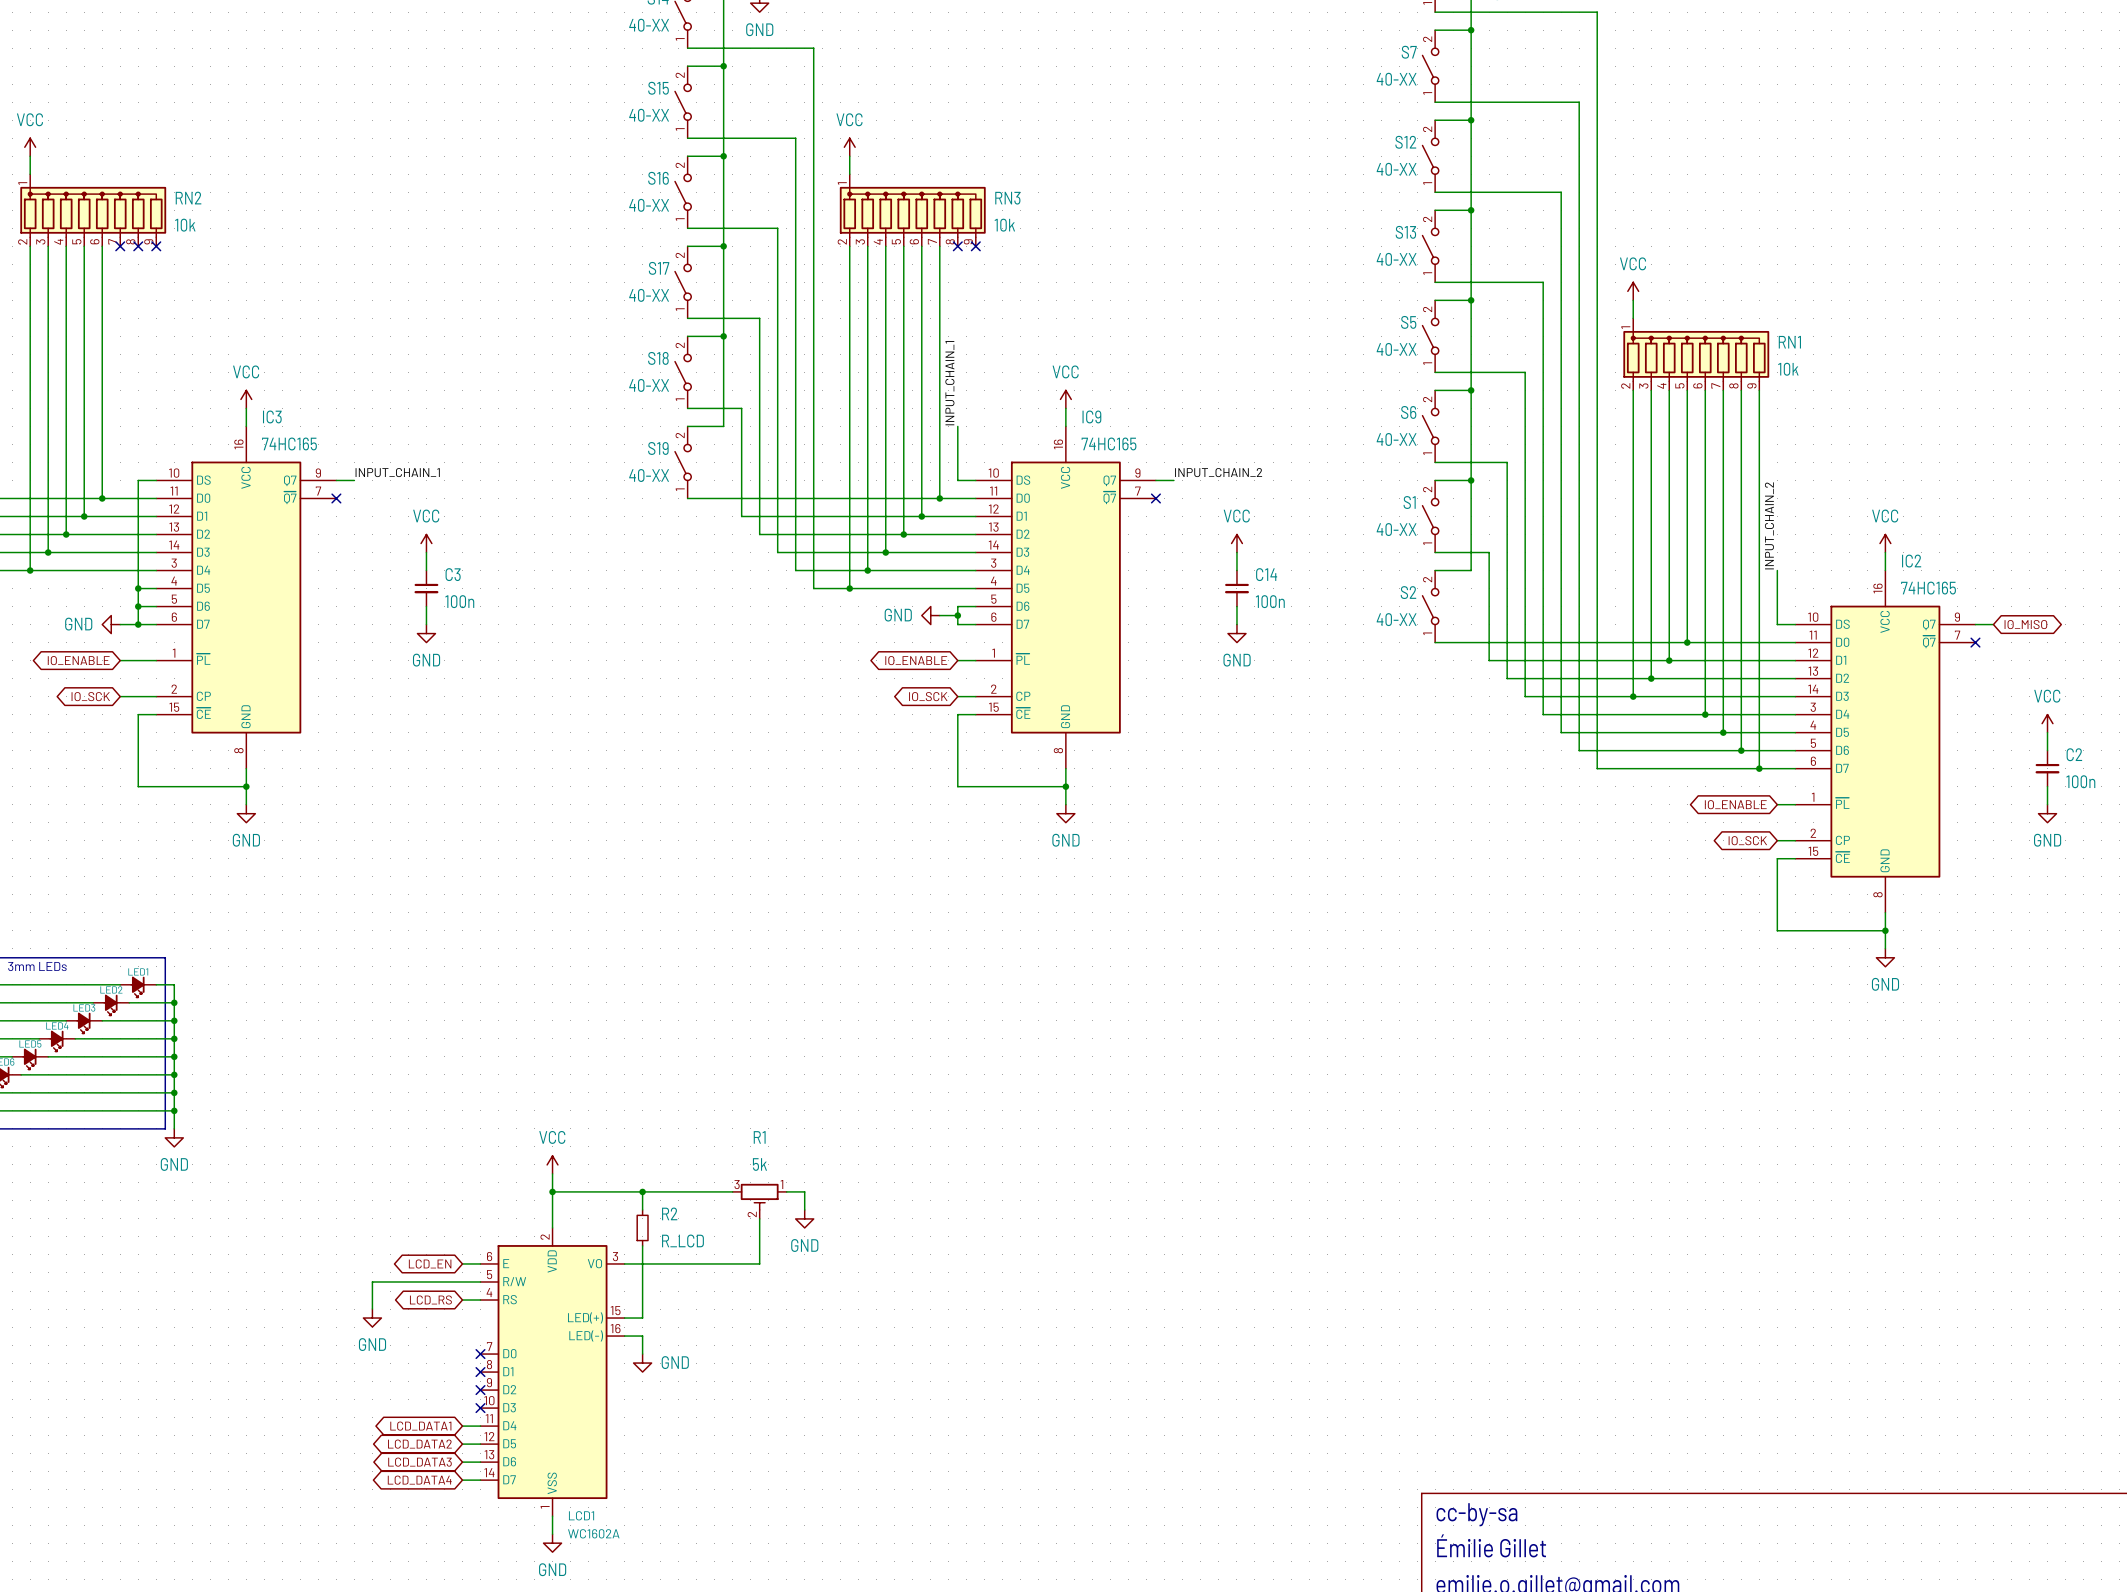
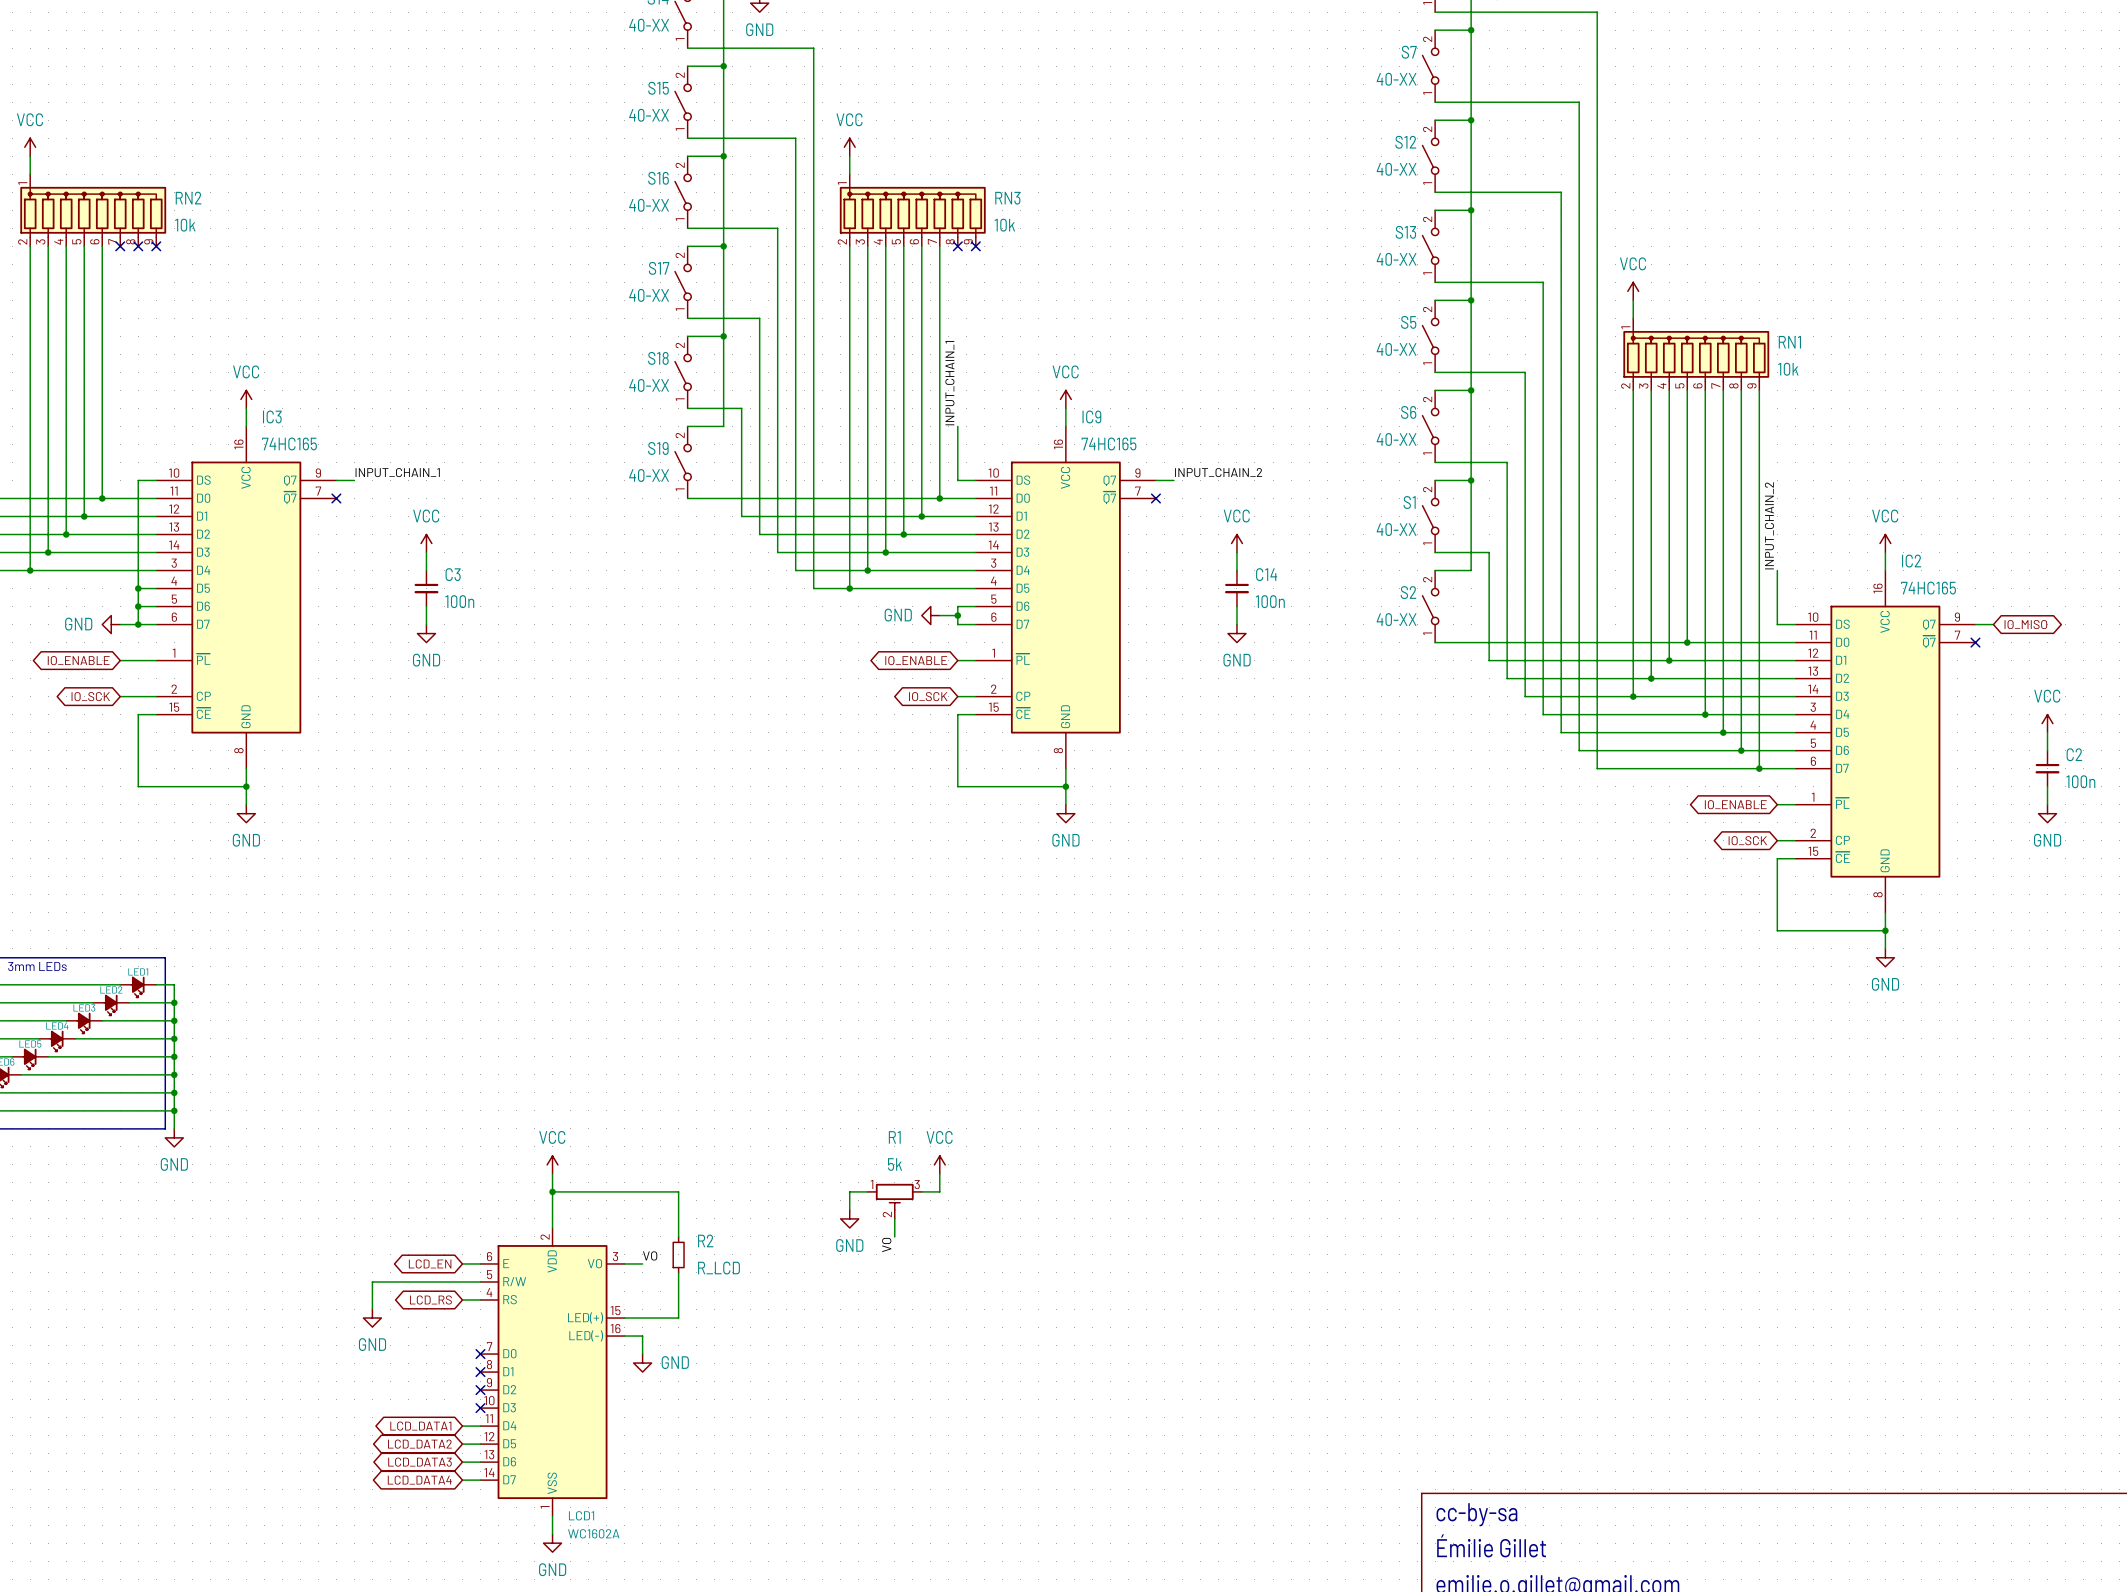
power symbol: none -> VCC (939, 1164)
wire: none -> (939, 1173) (939, 1191) (921, 1191)
wire: (642, 1191) (642, 1209) -> none
junction: (642, 1191) -> none
wire: (678, 1191) (732, 1191) -> (678, 1191) (678, 1236)
wire: (786, 1191) (804, 1191) (804, 1209) -> none
wire: none -> (867, 1191) (849, 1191) (849, 1209)
R1 flip: as is (759, 1196) -> left-right (894, 1196)
R1 position: (759, 1201) -> (894, 1201)
wire: (759, 1218) (759, 1263) (642, 1263) -> none
power symbol position: GND (804, 1218) -> GND (849, 1218)
wire: none -> (894, 1218) (894, 1236)
R2 position: (642, 1227) -> (678, 1254)
wire: (642, 1245) (642, 1318) -> (678, 1272) (678, 1318) (642, 1318)
label: none -> VO (886, 1245)
label: none -> VO (650, 1255)

